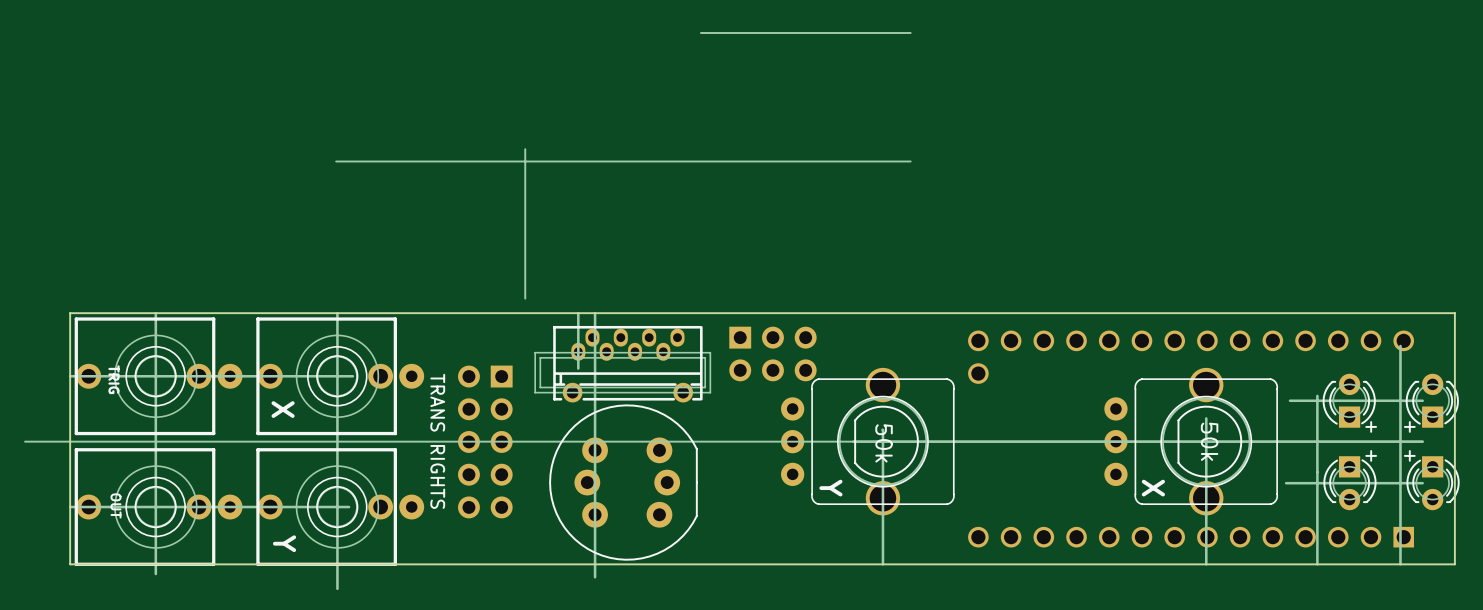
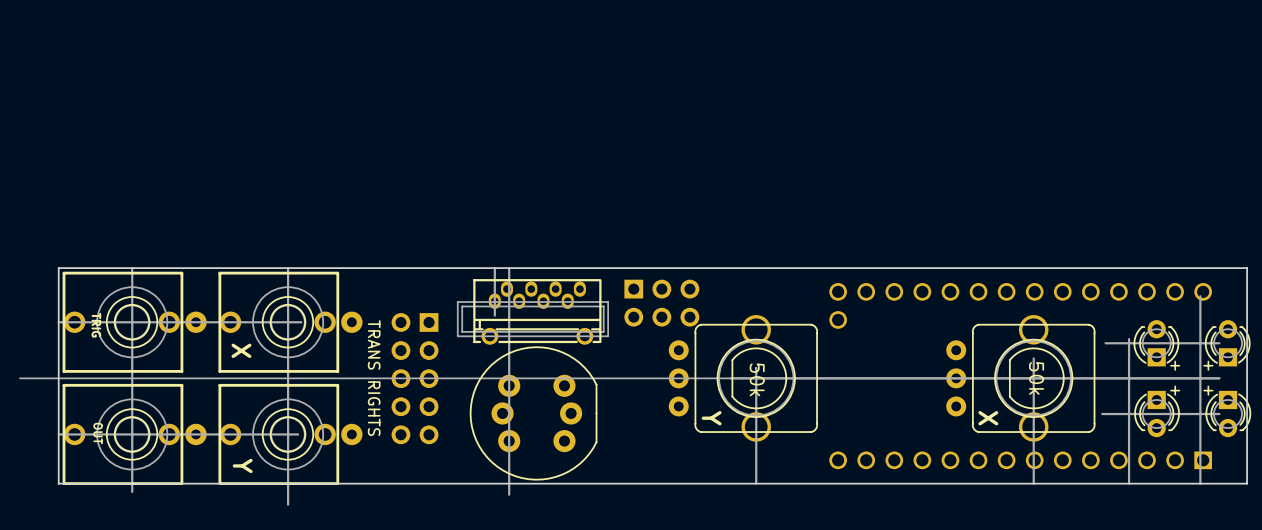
line: (700, 32) (910, 32) -> none
line: (525, 149) (525, 298) -> none
line: (336, 161) (910, 161) -> none

